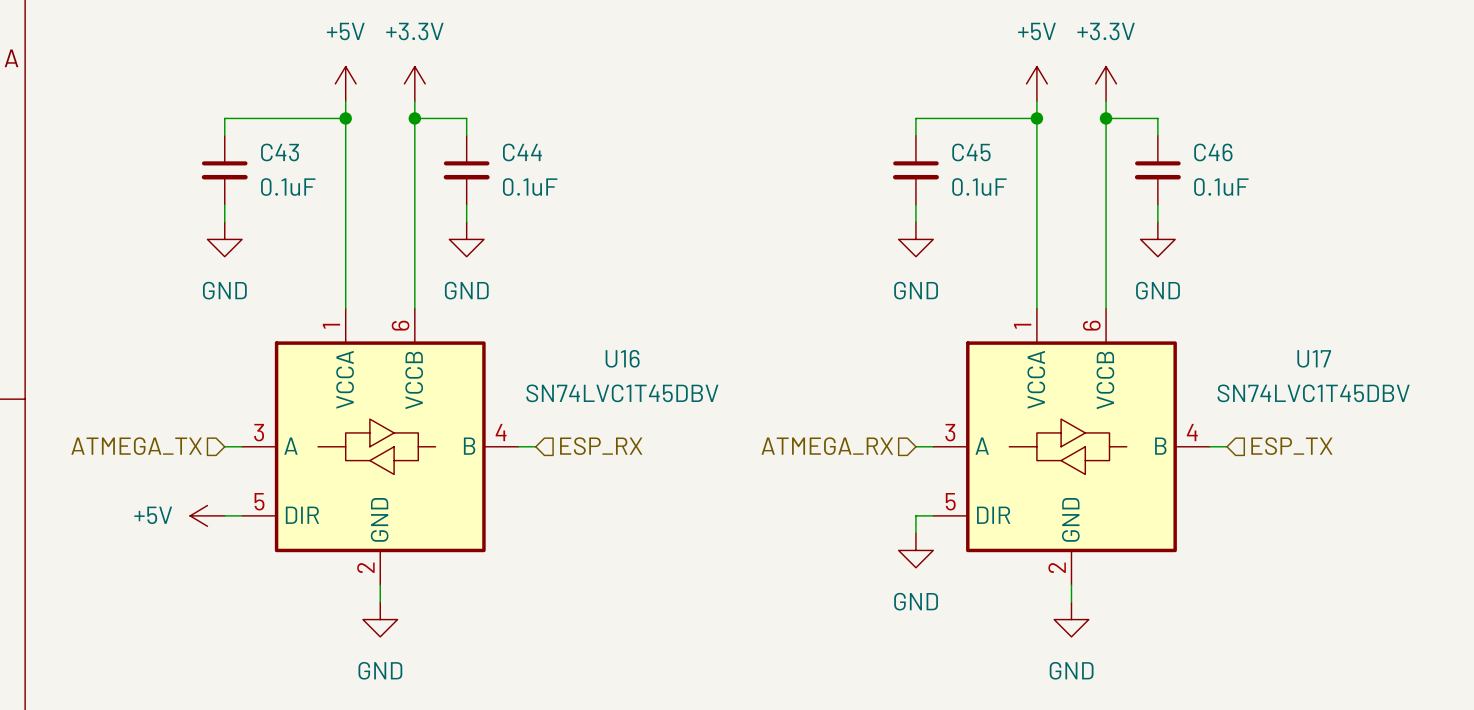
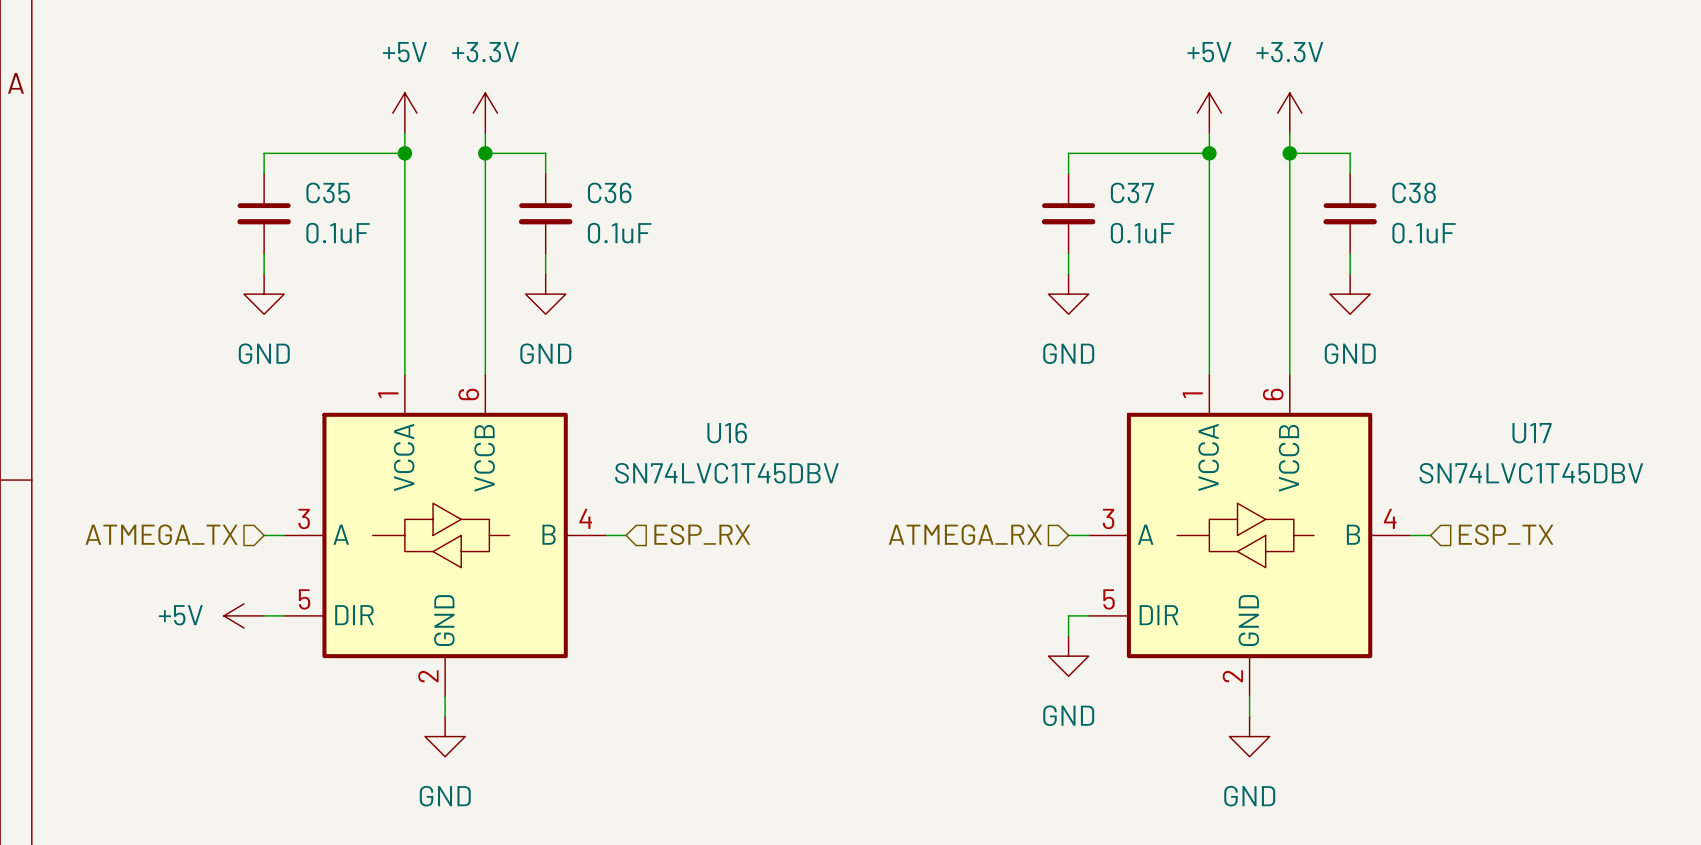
C43 name: C43 (280, 152) -> C35 (328, 192)
C44 name: C44 (522, 152) -> C36 (609, 192)
C45 name: C45 (971, 152) -> C37 (1132, 192)
C46 name: C46 (1213, 152) -> C38 (1414, 192)

